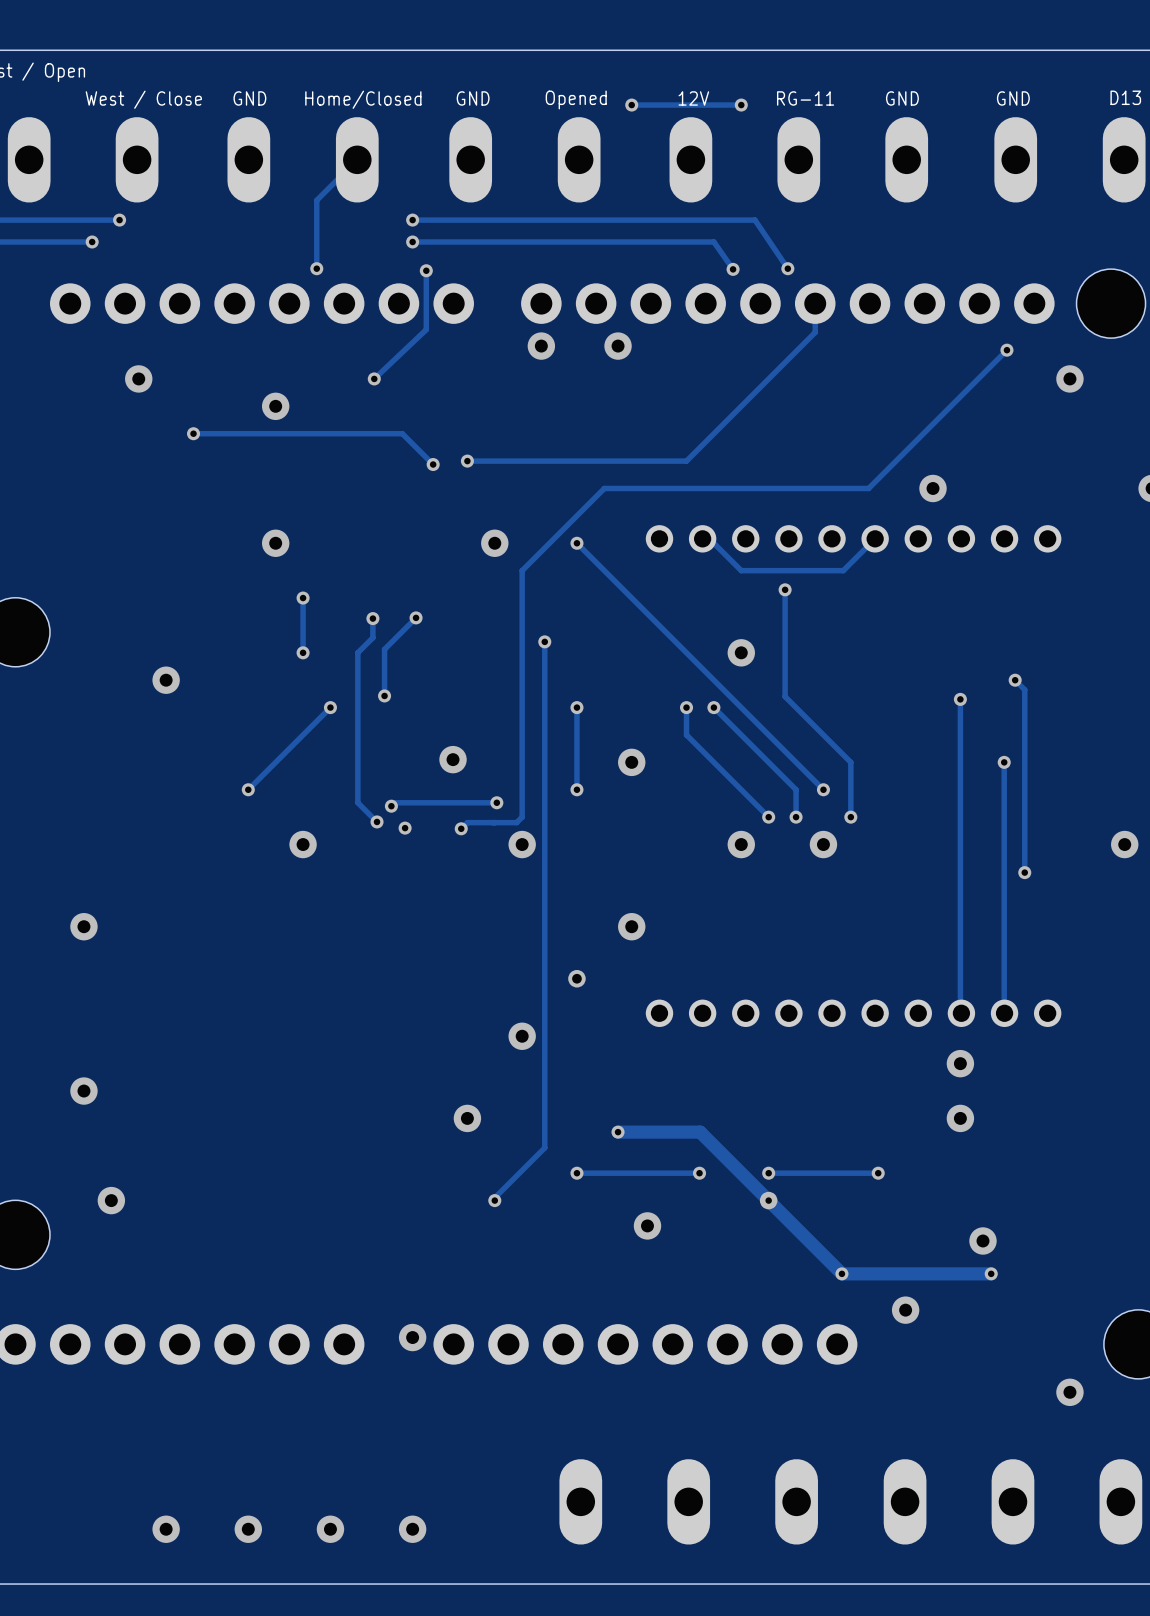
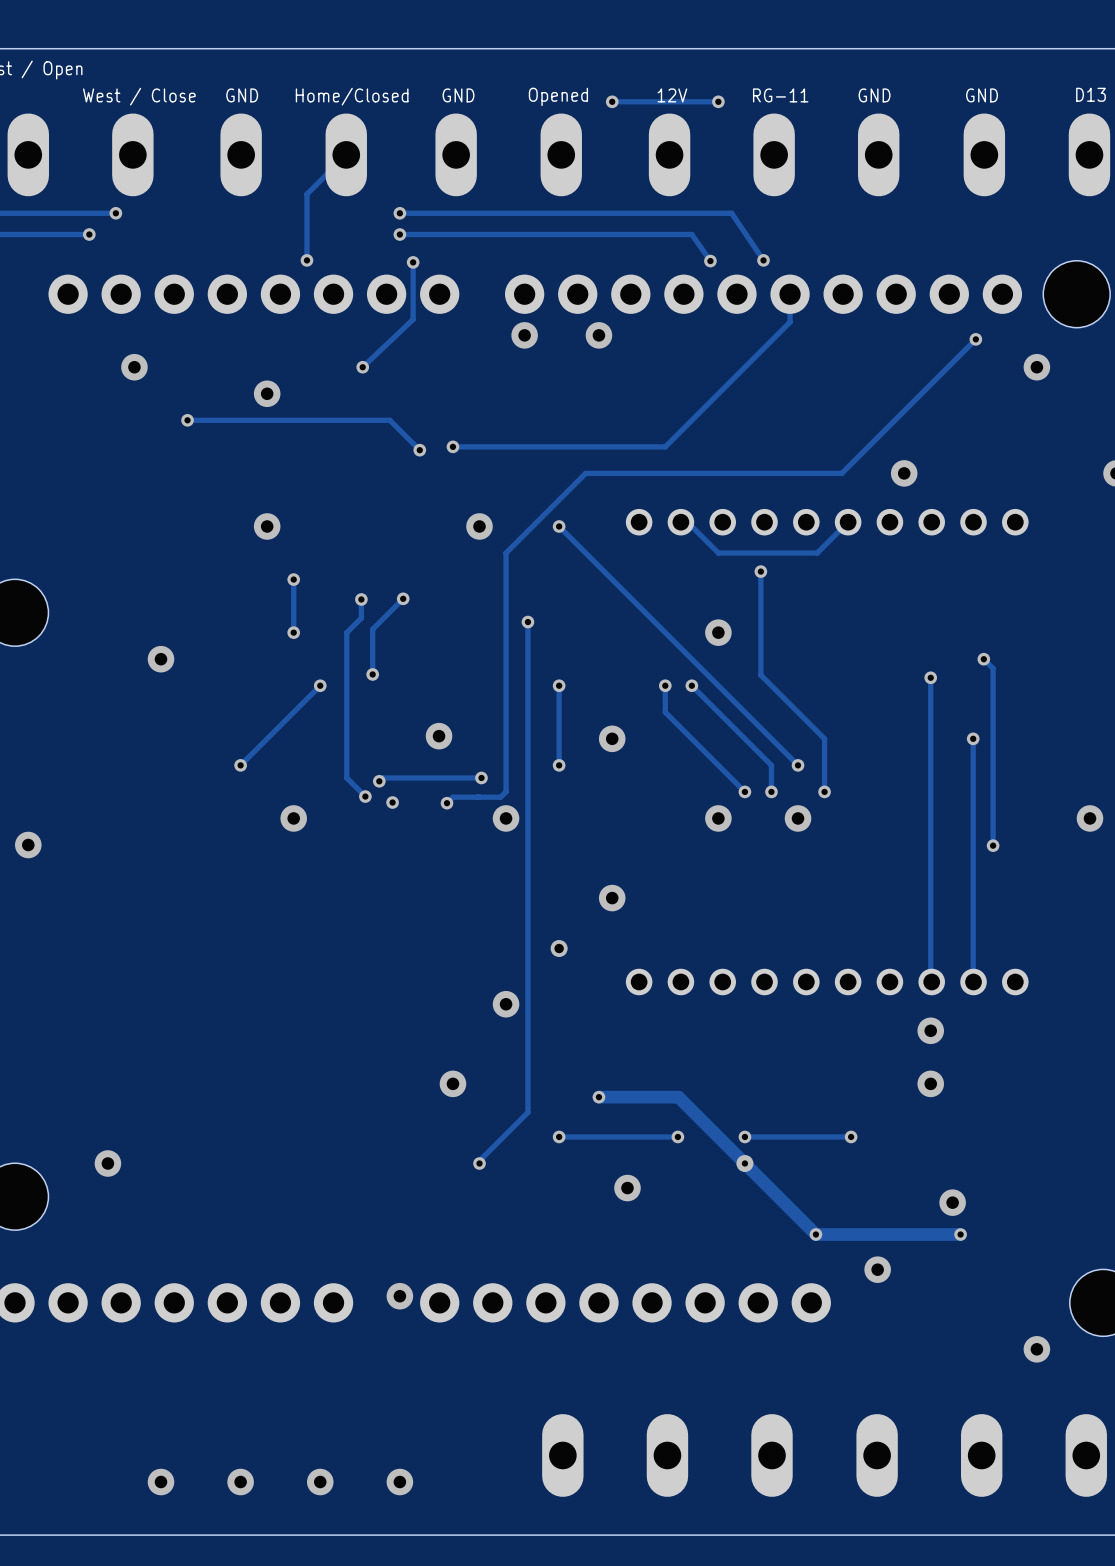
via position: (83, 926) -> (28, 844)
via: (83, 1091) -> none

